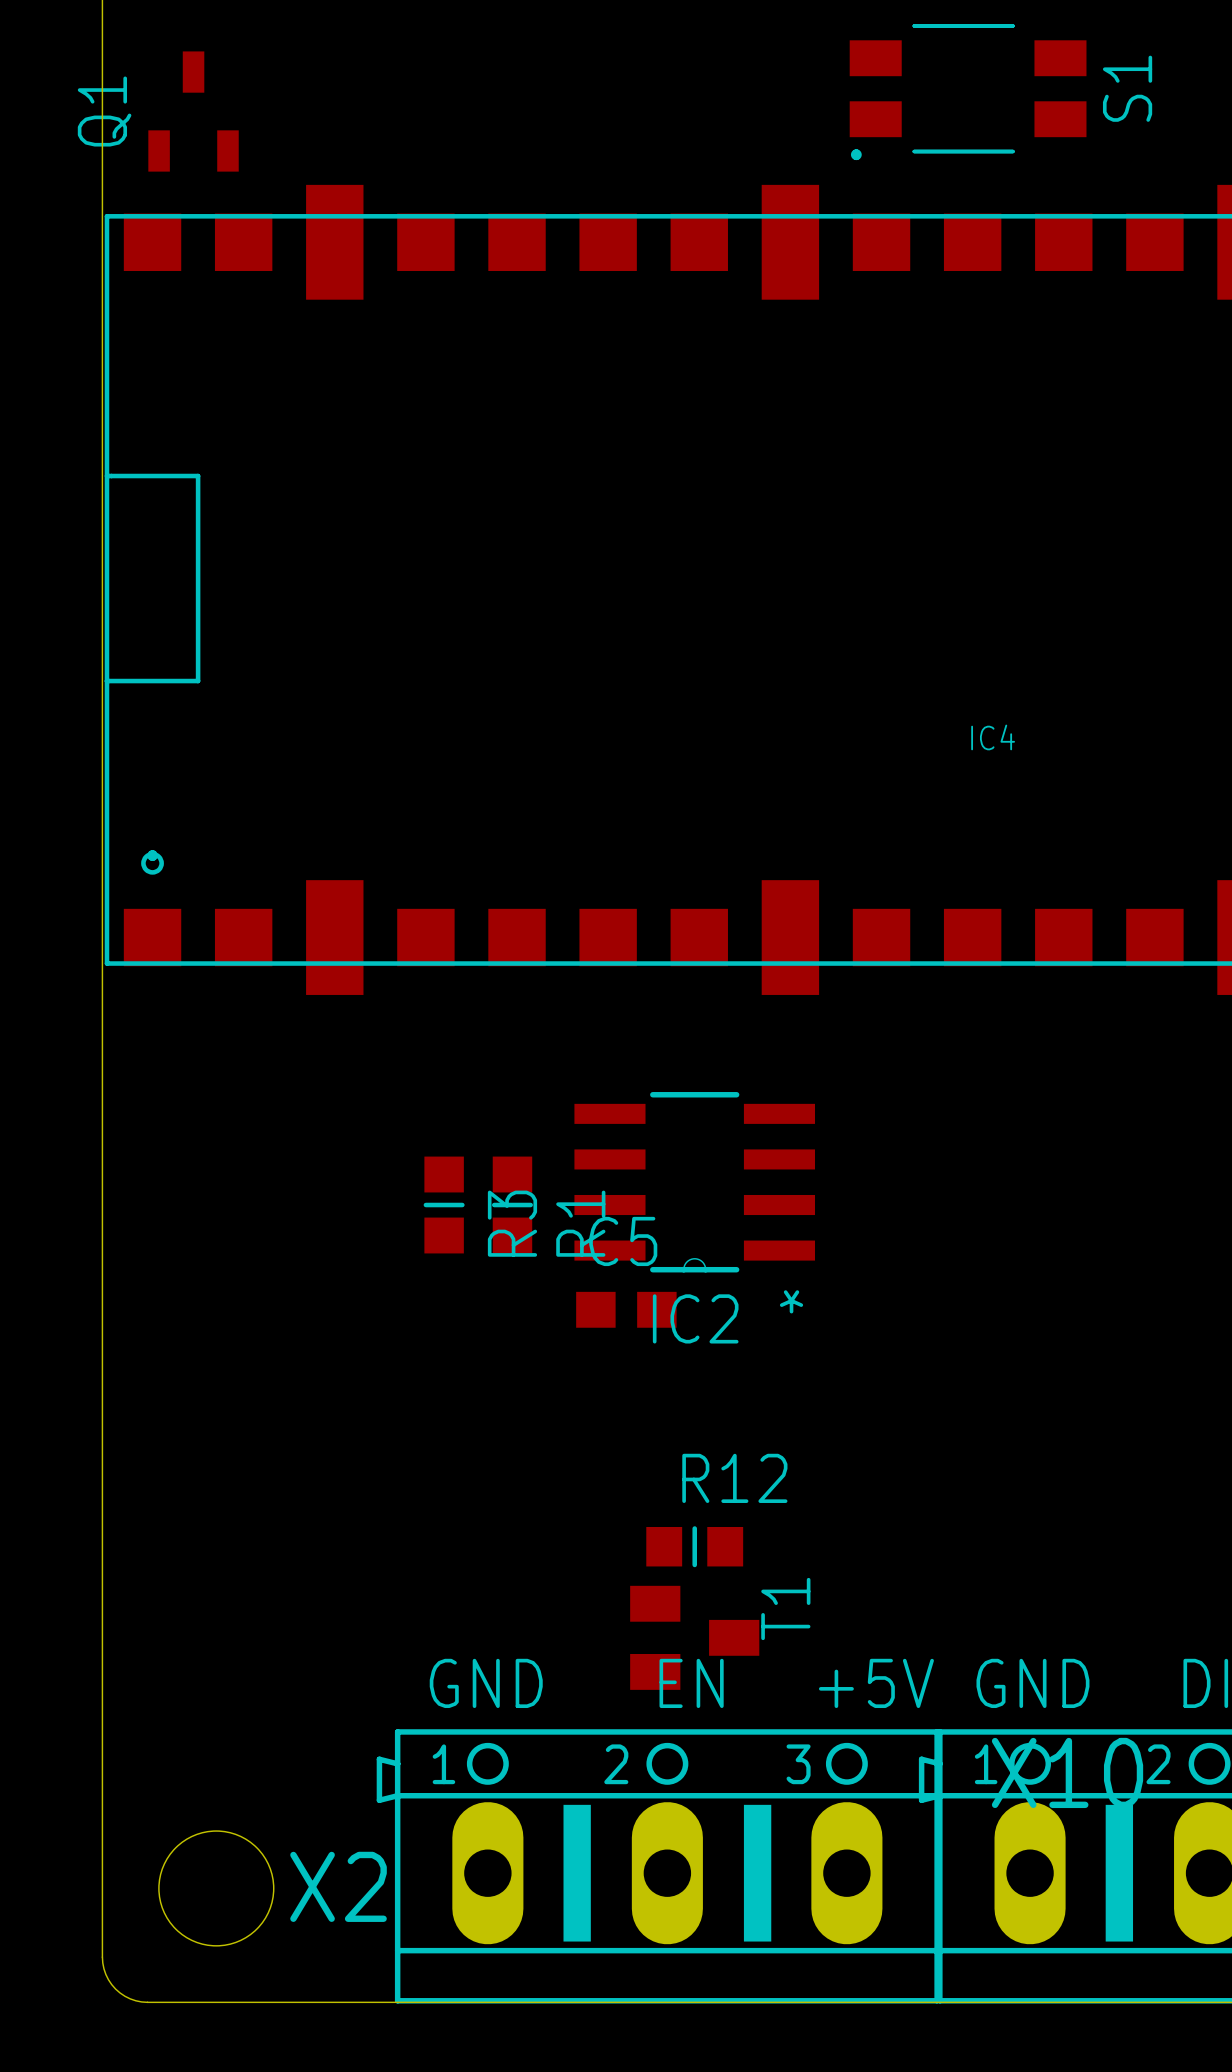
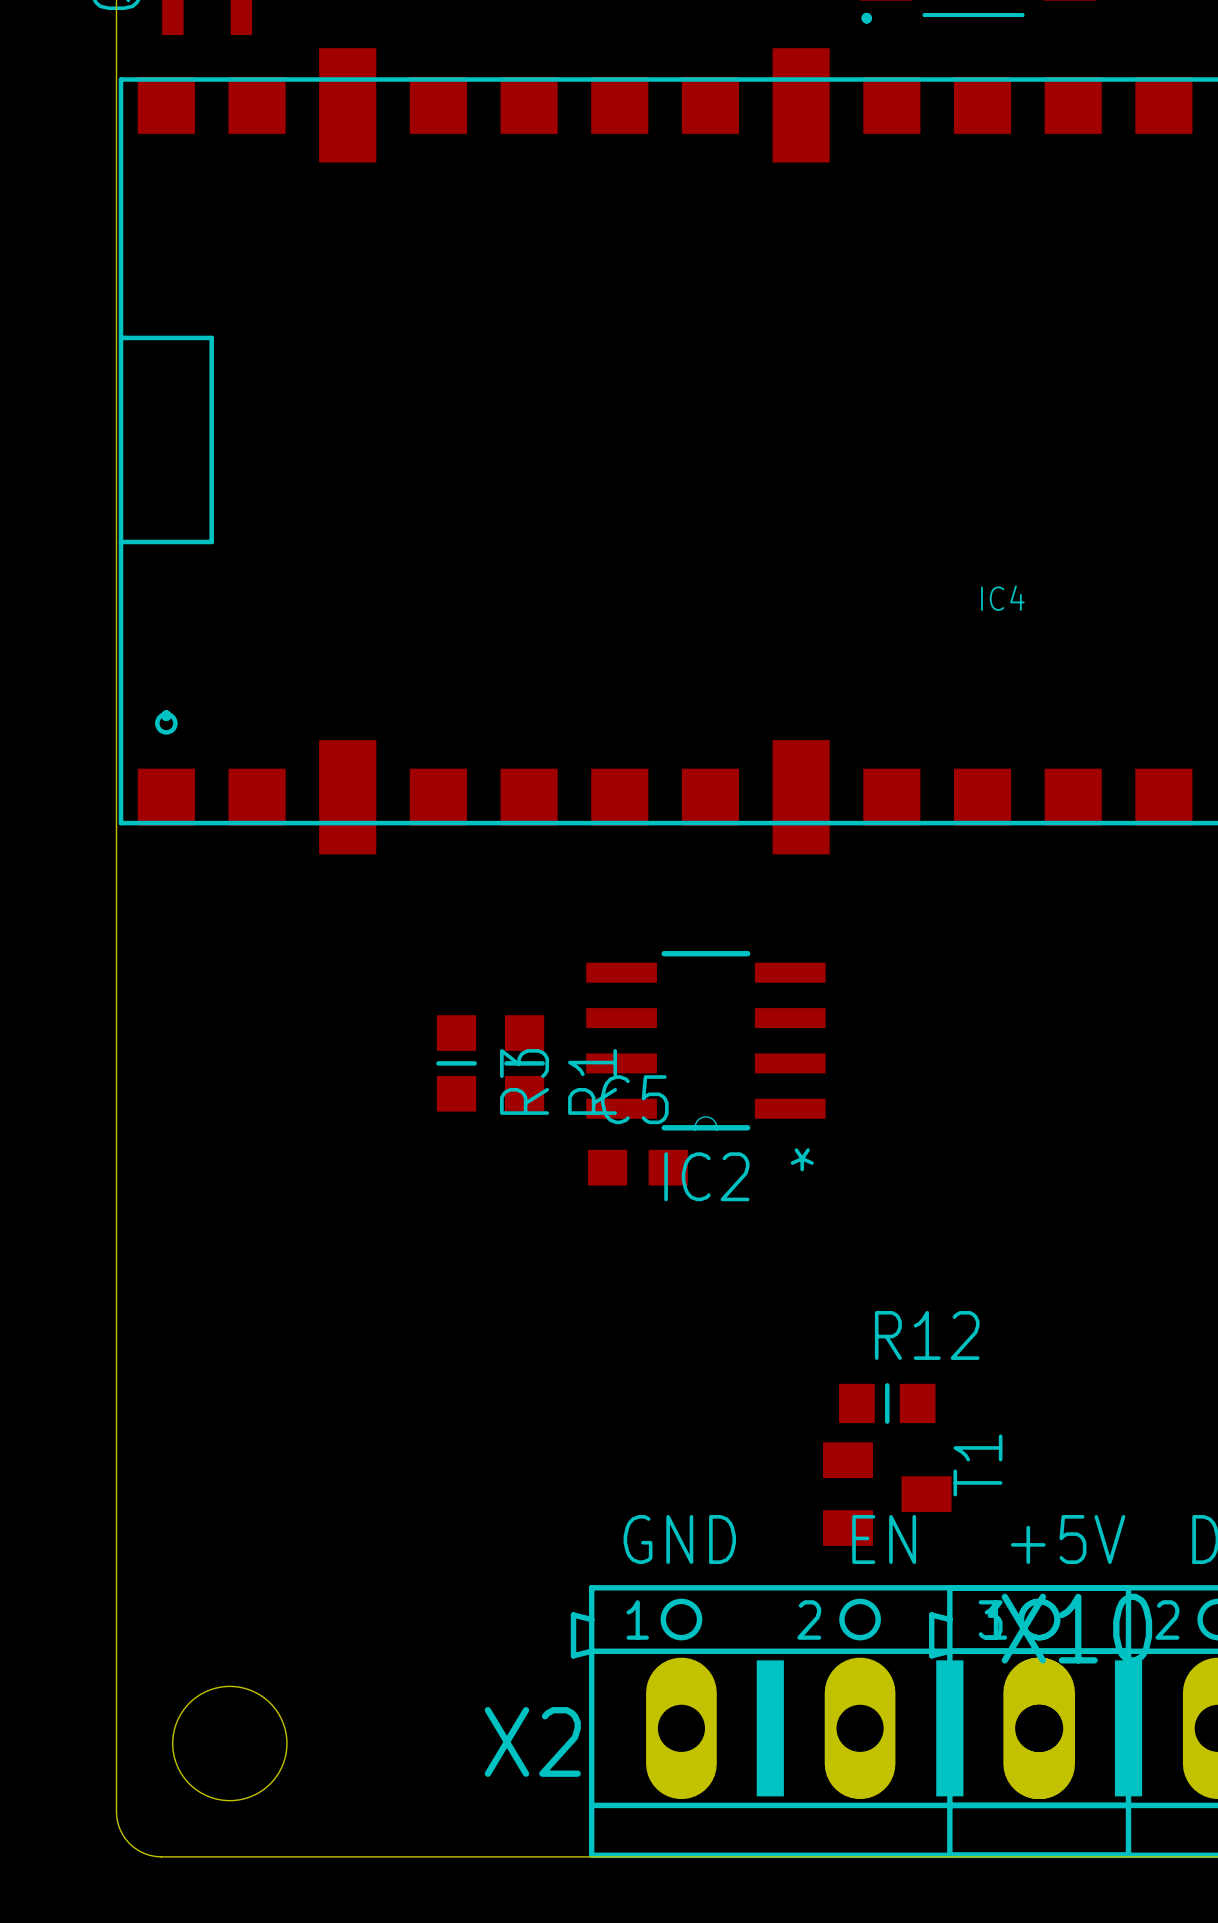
R12 position: (694, 1546) -> (887, 1403)
T1 position: (694, 1637) -> (887, 1494)
text: GND (486, 1683) -> none
text: none -> GND (679, 1539)
text position: EN (691, 1683) -> EN (884, 1539)
text: +5V (876, 1683) -> none
text: GND (1032, 1683) -> +5V (1068, 1539)
X2 position: (658, 1866) -> (851, 1721)

